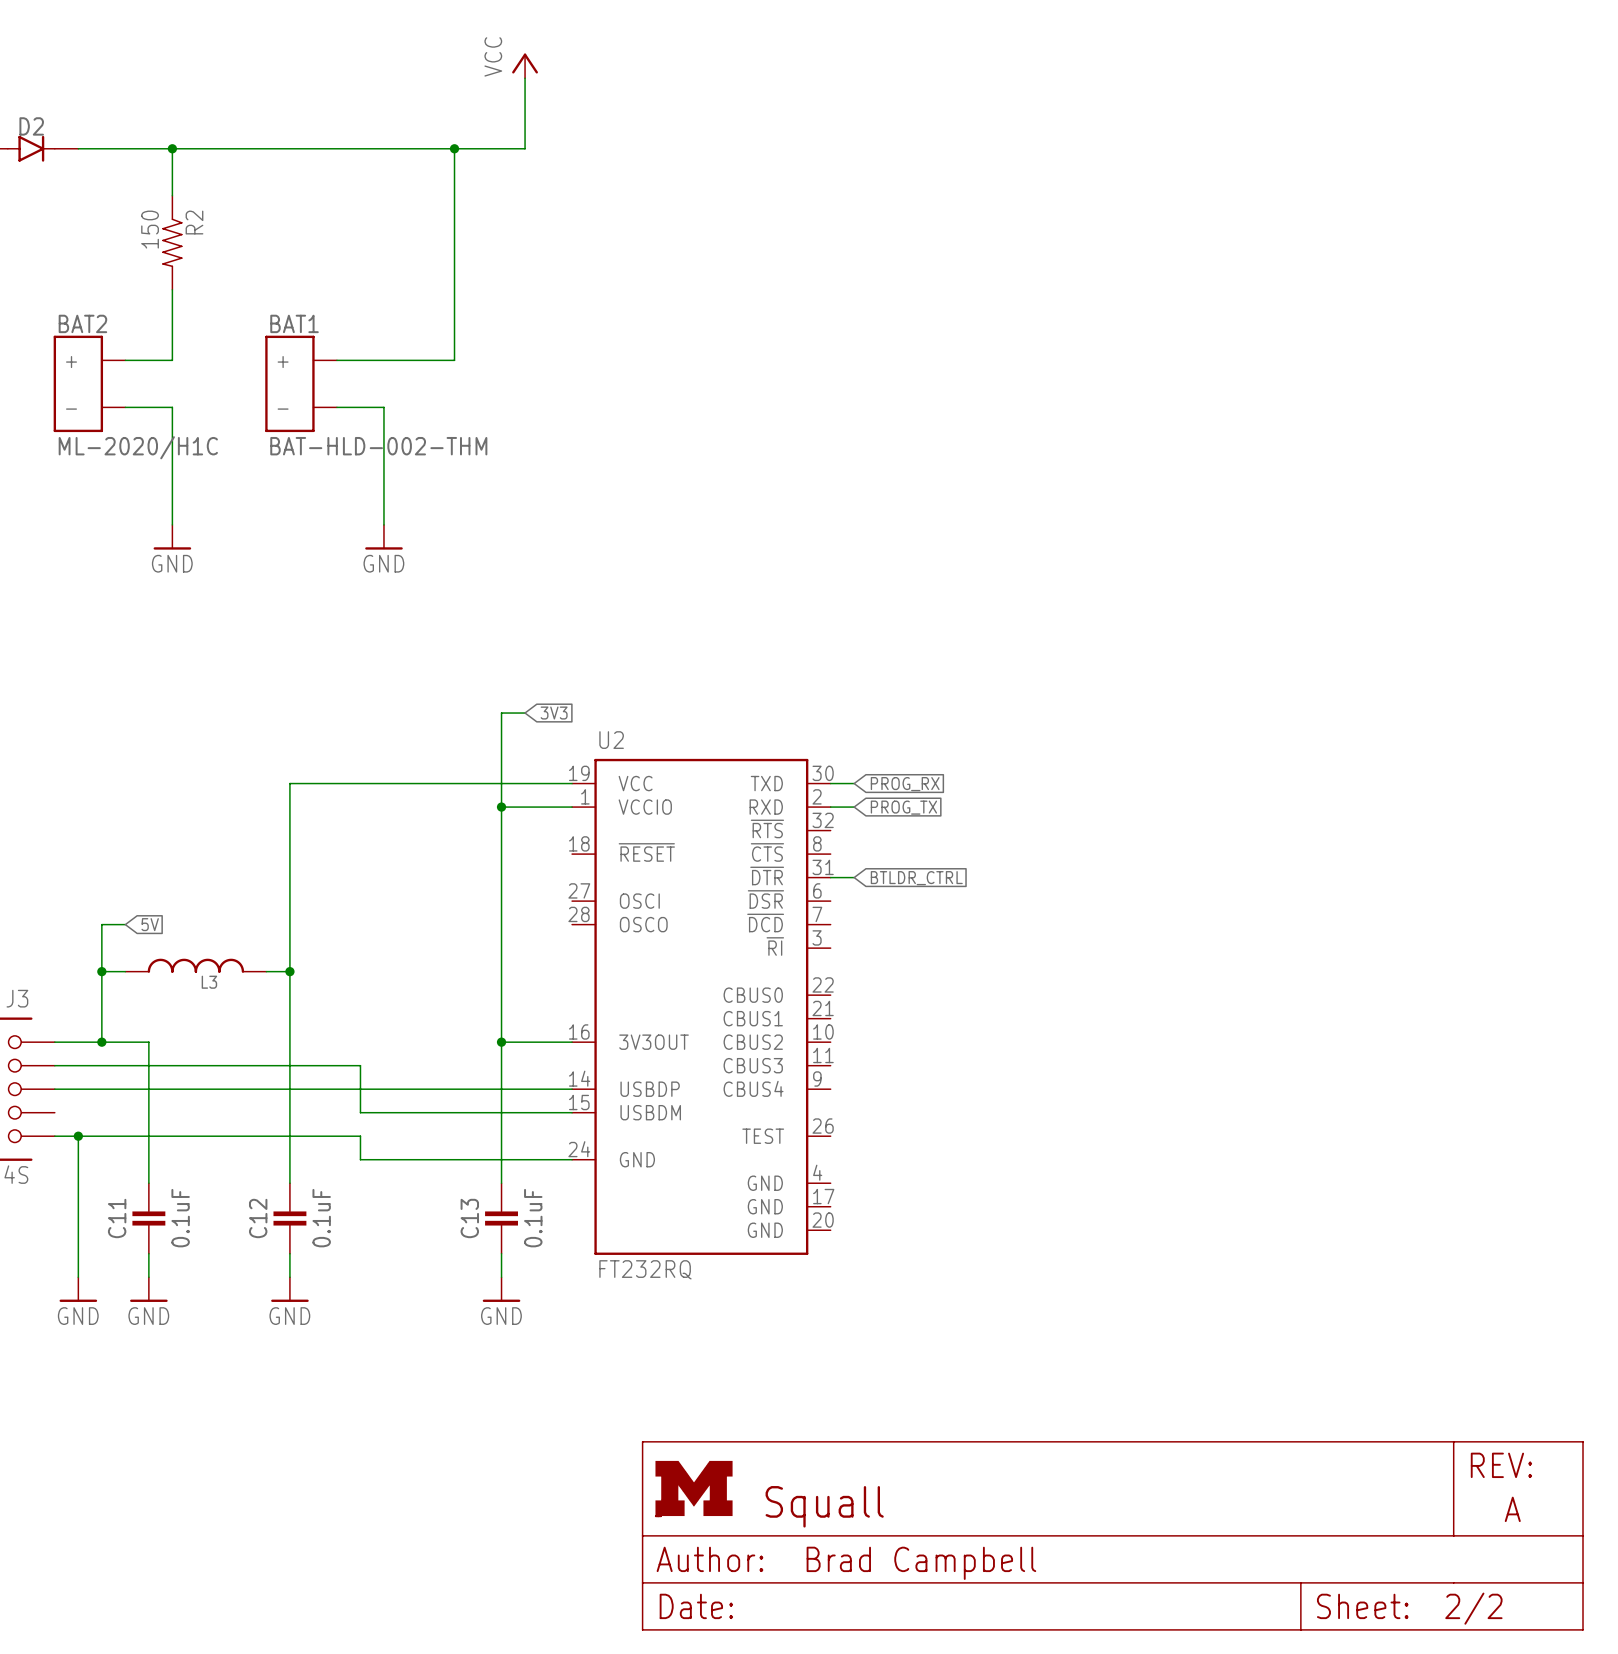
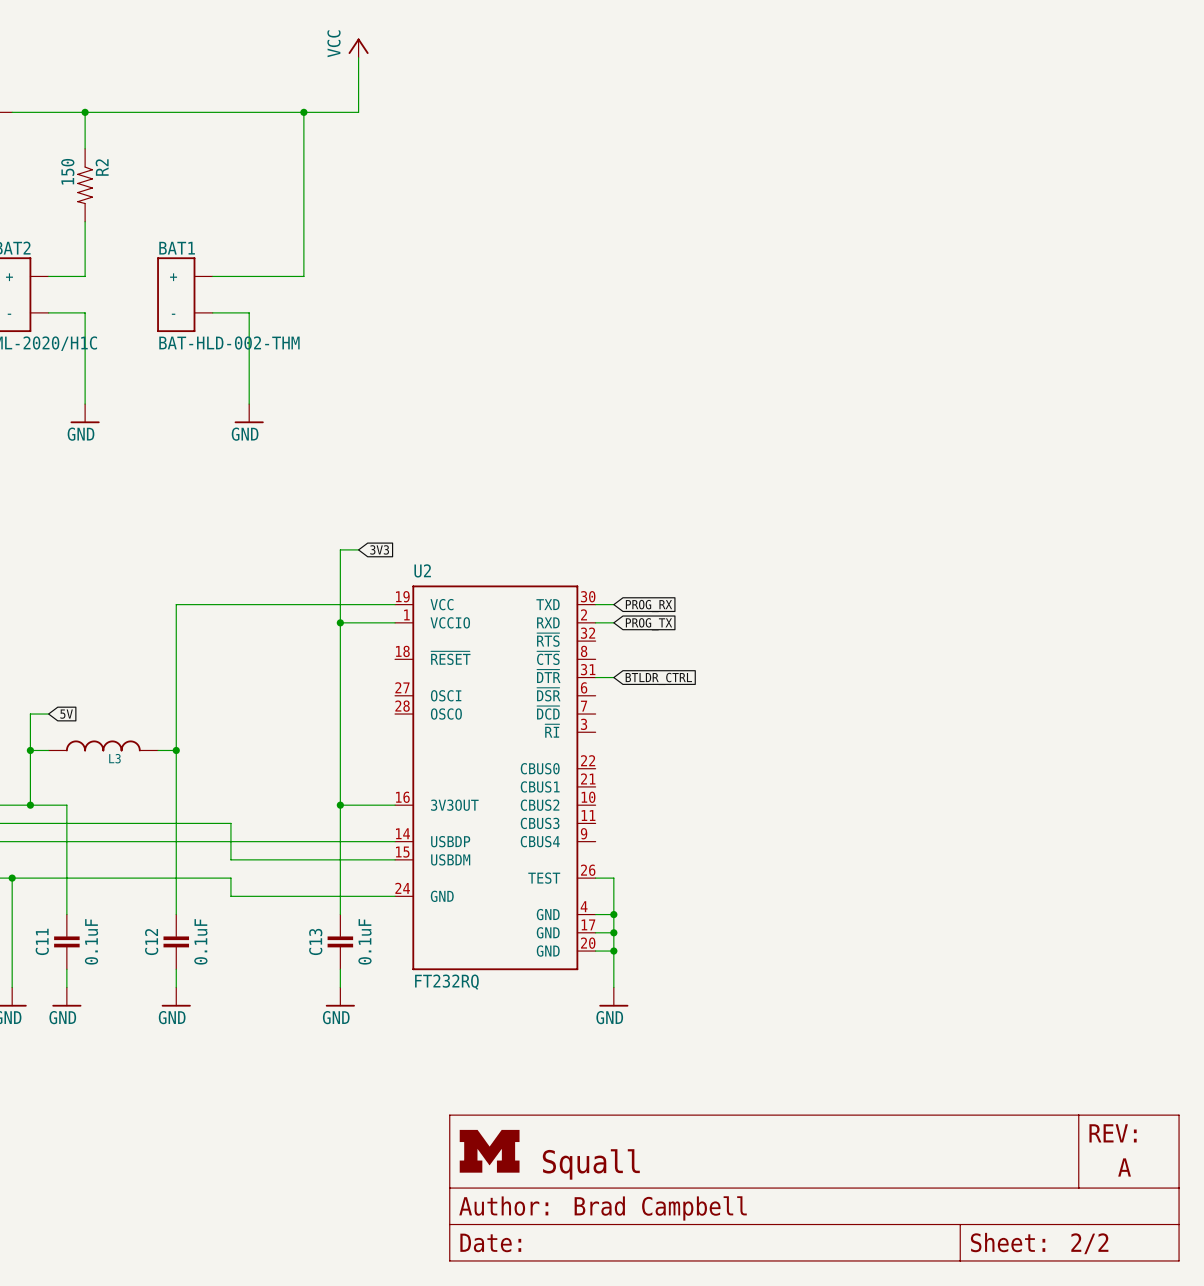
wire: none -> (595, 878) (613, 878) (613, 987)
wire: none -> (595, 914) (613, 914)
junction: none -> (613, 914)
wire: none -> (595, 932) (613, 932)
junction: none -> (613, 932)
wire: none -> (595, 951) (613, 951)
junction: none -> (613, 951)
power symbol: none -> GND (613, 997)

